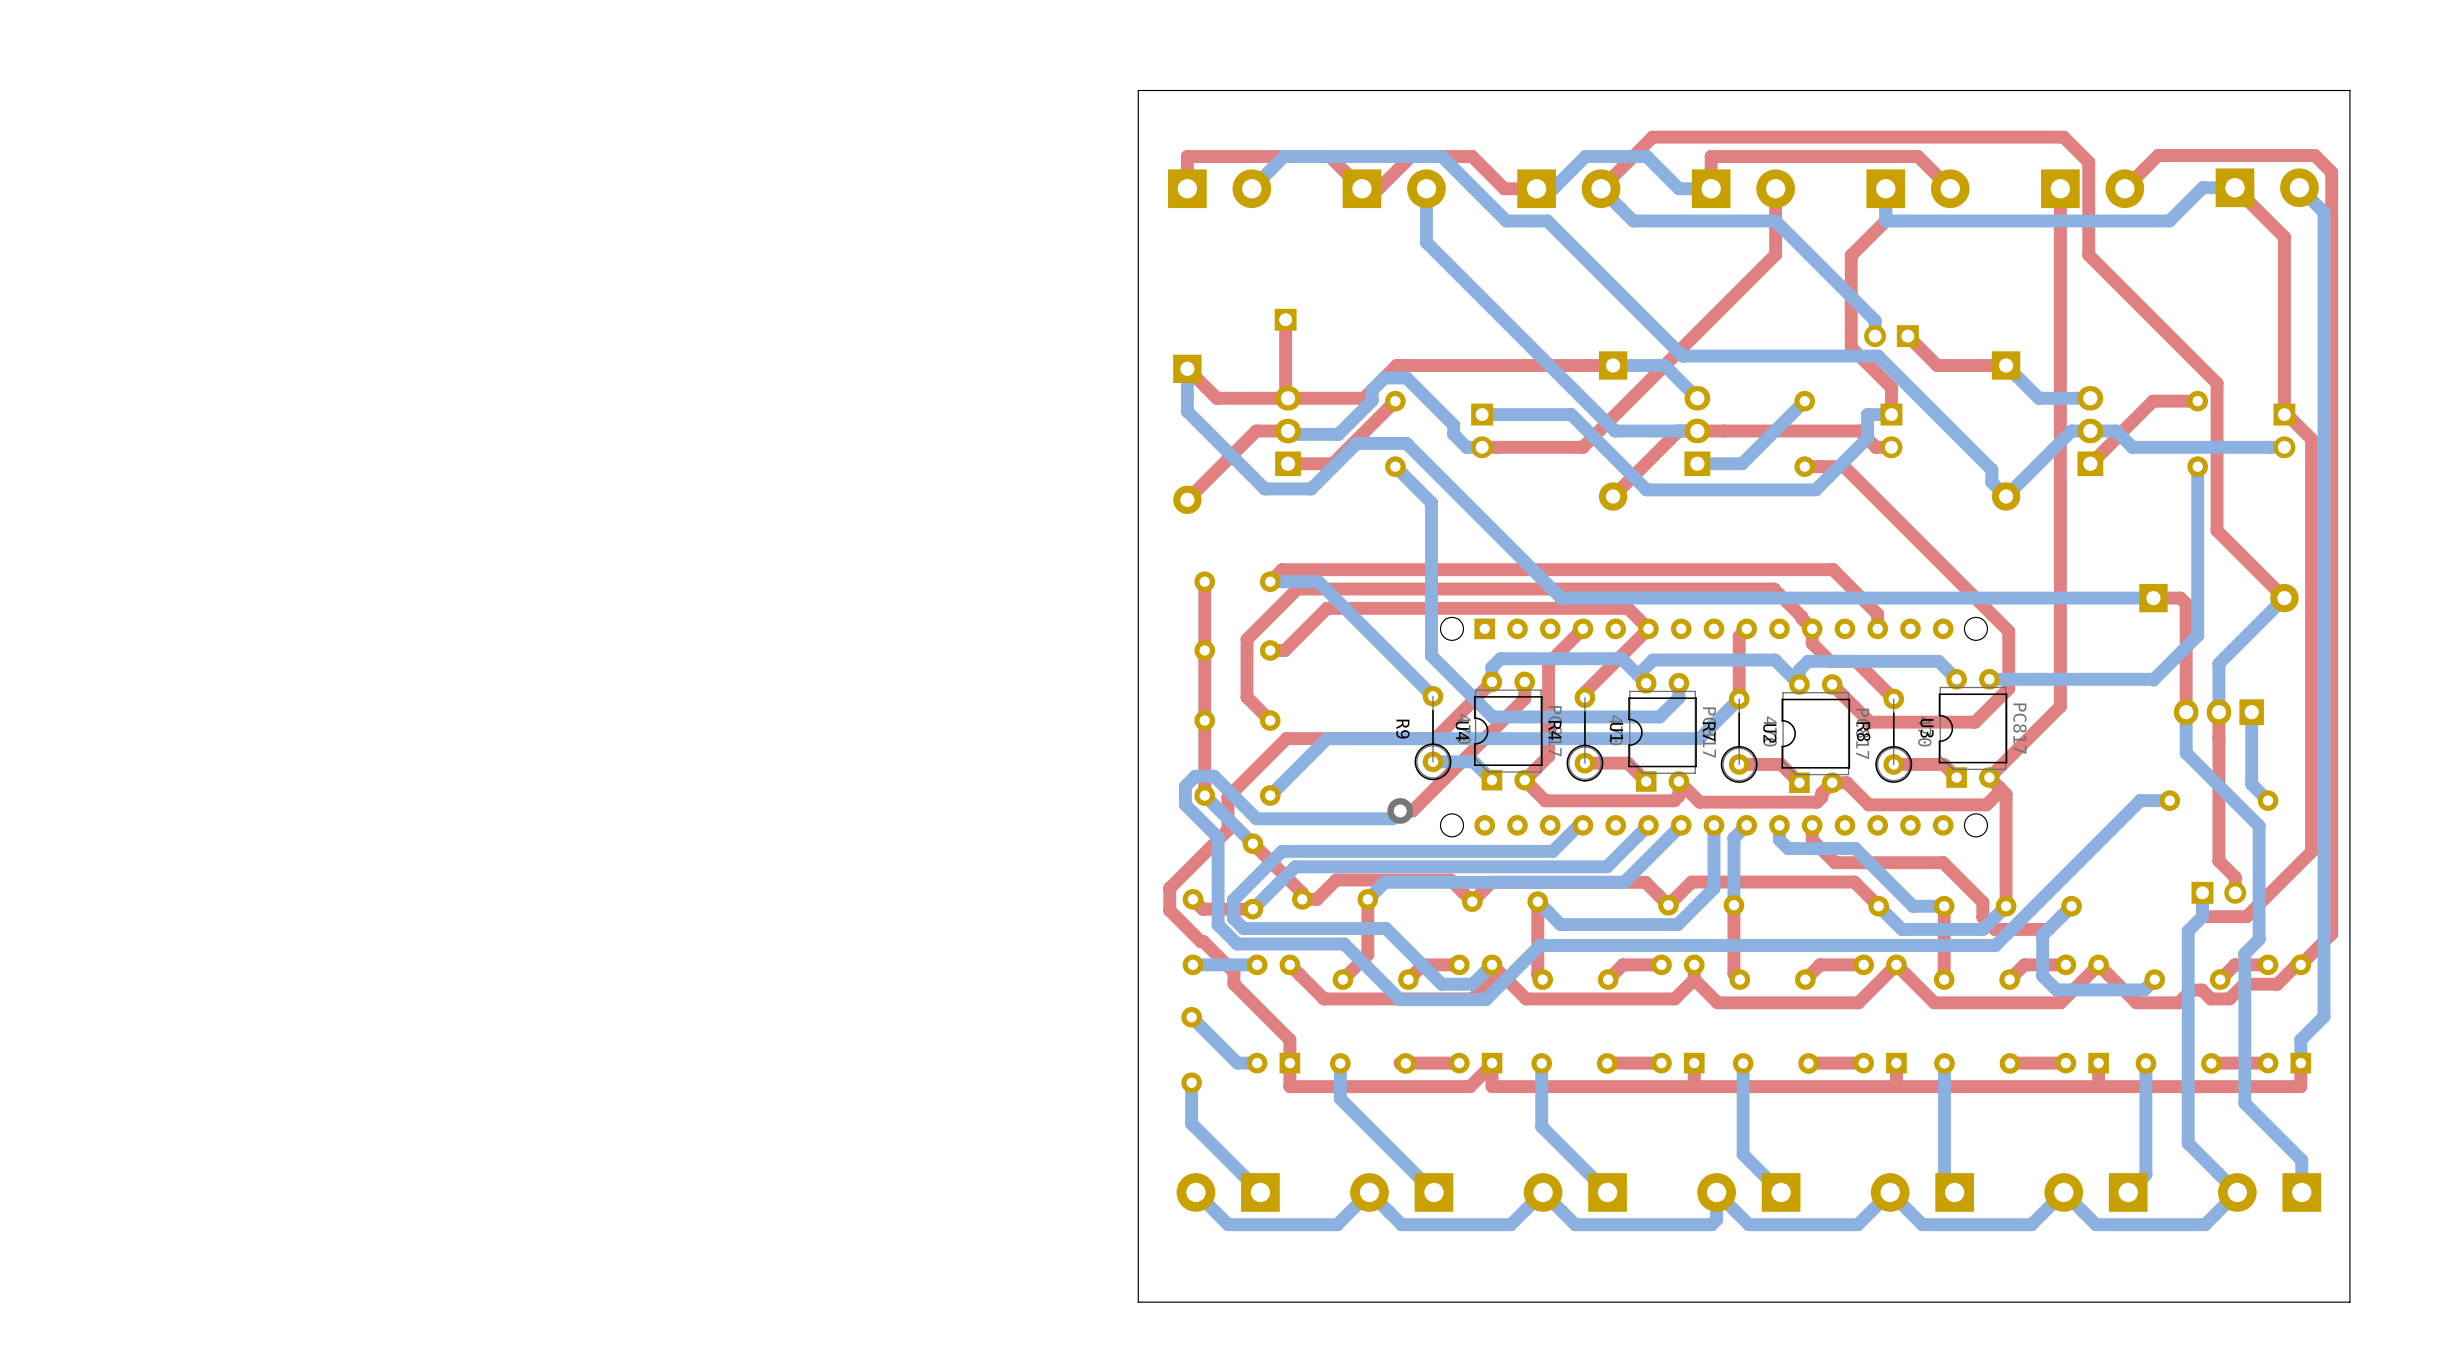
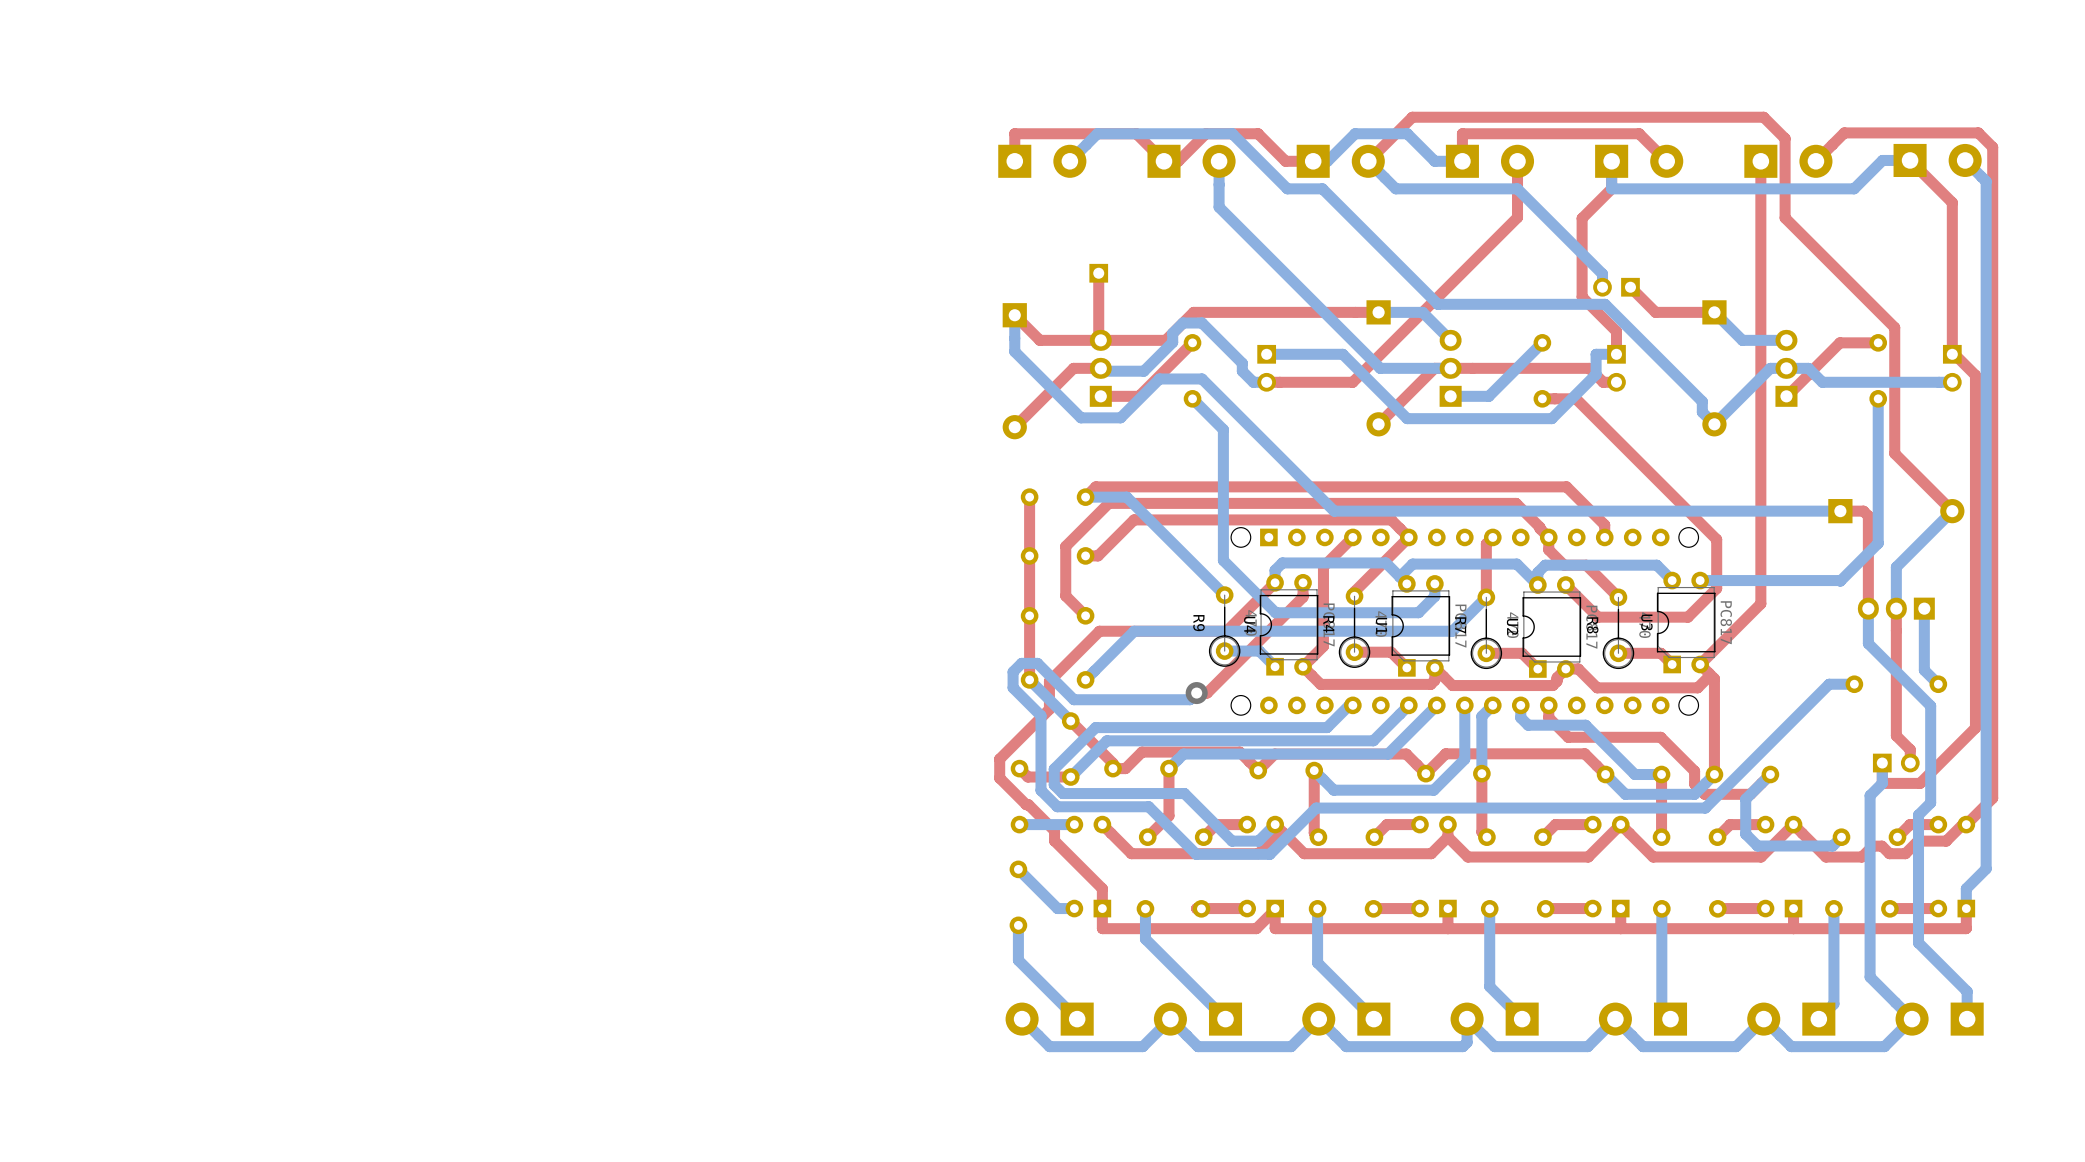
board edge: (2349, 90) (2349, 1302) (1138, 1302) (1138, 90) (2349, 90) -> none

